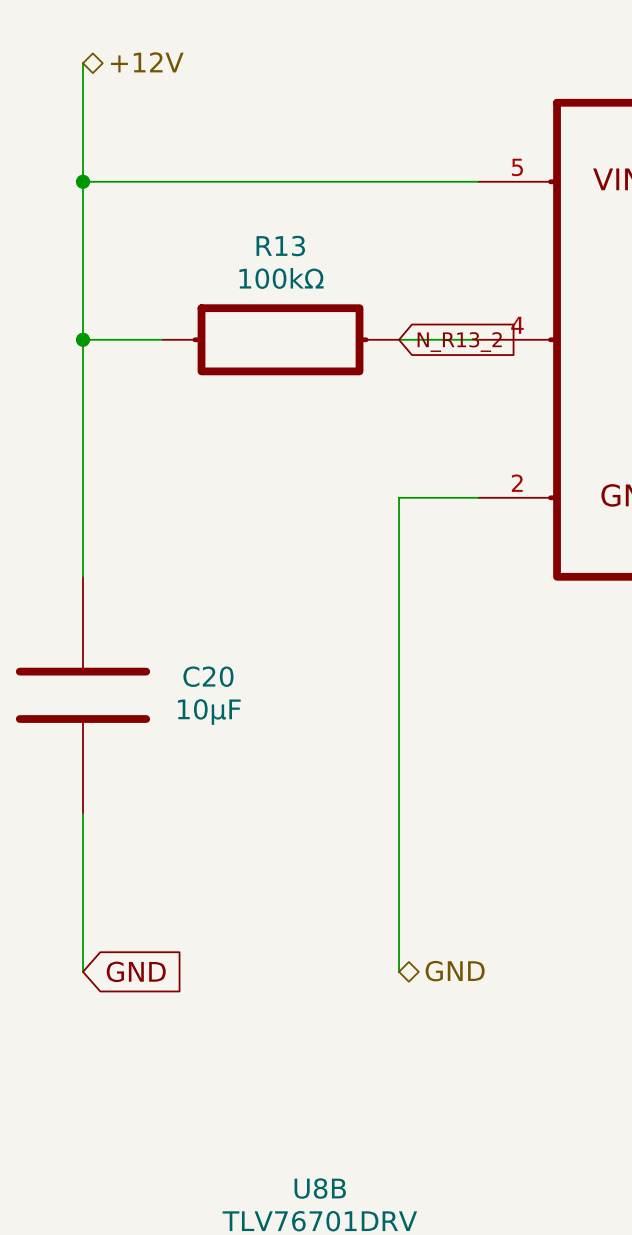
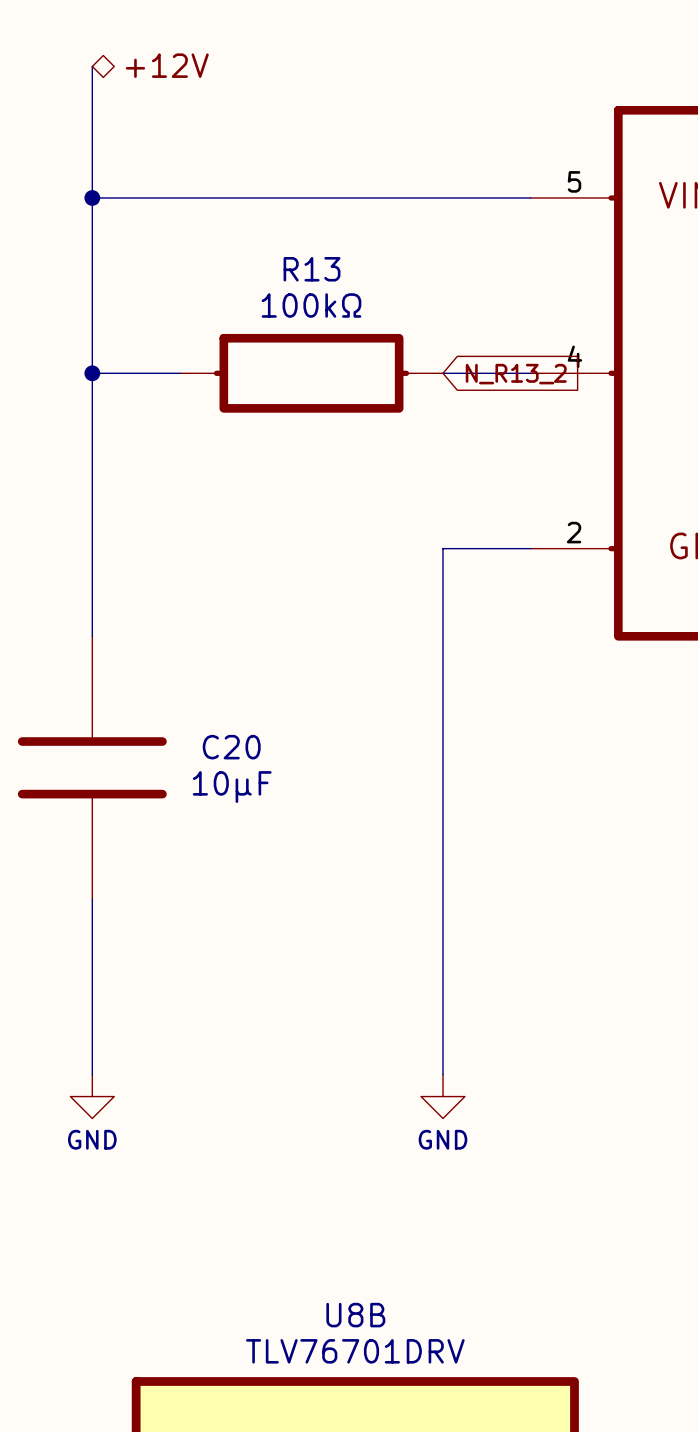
global label: GND (136, 971) -> none
hierarchical label: GND (455, 971) -> none
power symbol: none -> GND (92, 1096)
power symbol: none -> GND (442, 1096)

